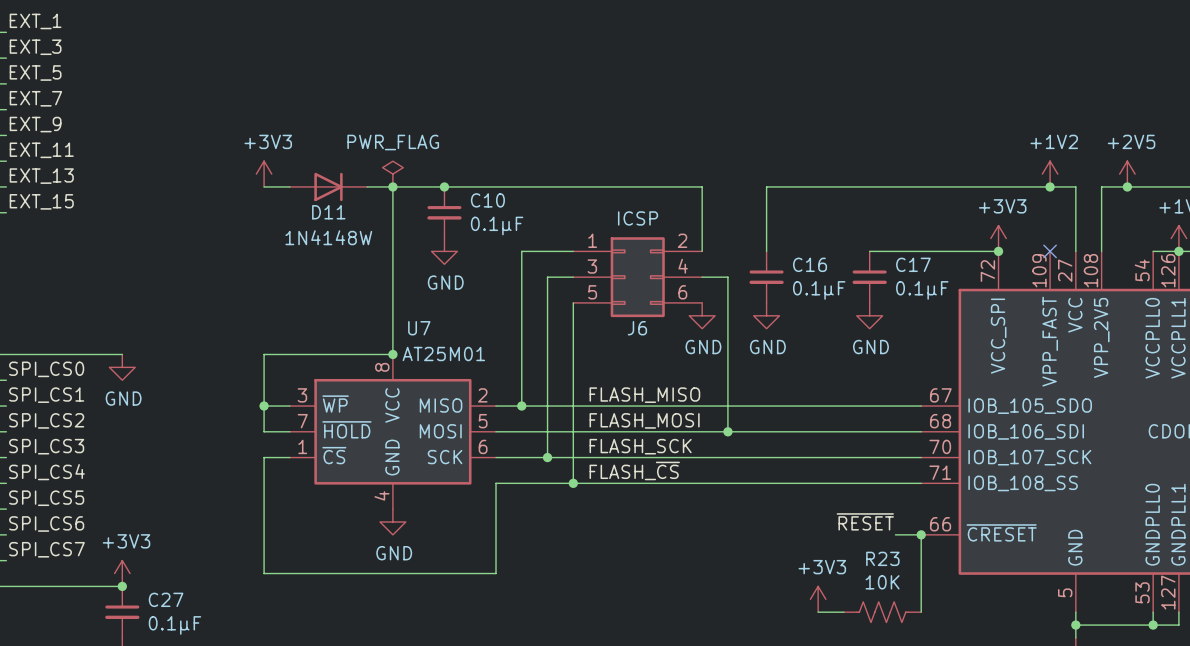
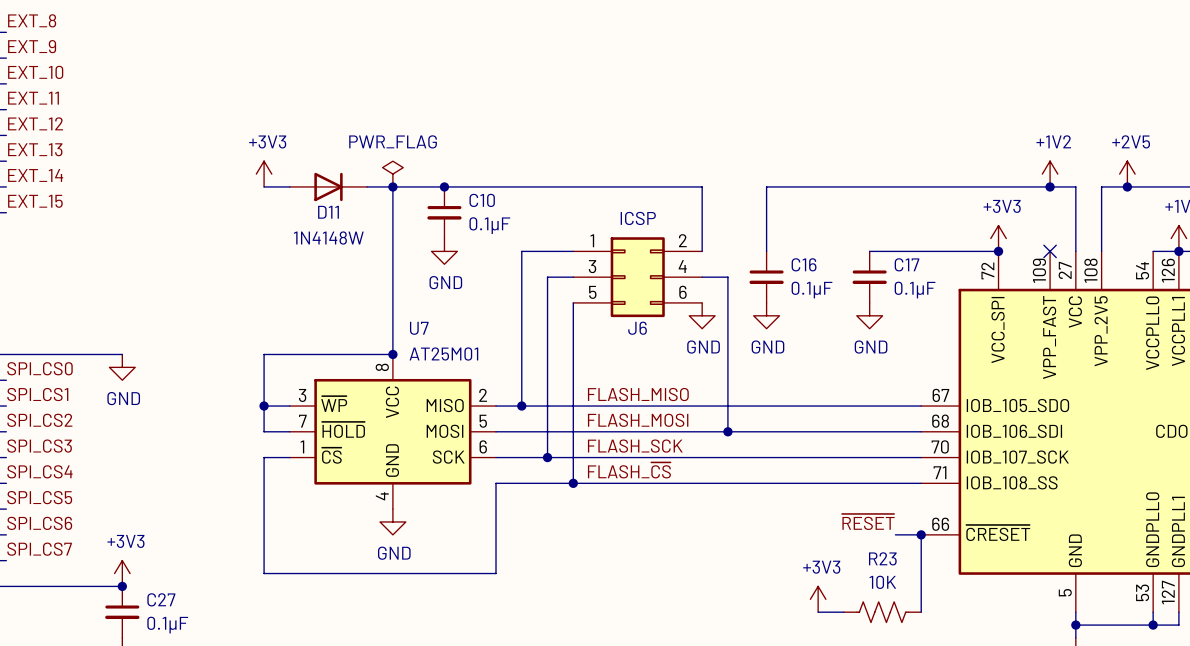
label: EXT_1 (35, 21) -> EXT_8 (32, 20)
label: EXT_3 (35, 47) -> EXT_9 (32, 46)
label: EXT_5 (35, 73) -> EXT_10 (35, 72)
label: EXT_7 (35, 98) -> EXT_11 (33, 98)
label: EXT_9 (35, 124) -> EXT_12 (35, 123)
label: EXT_11 (41, 150) -> EXT_13 (35, 149)
label: EXT_13 (41, 176) -> EXT_14 (35, 175)

